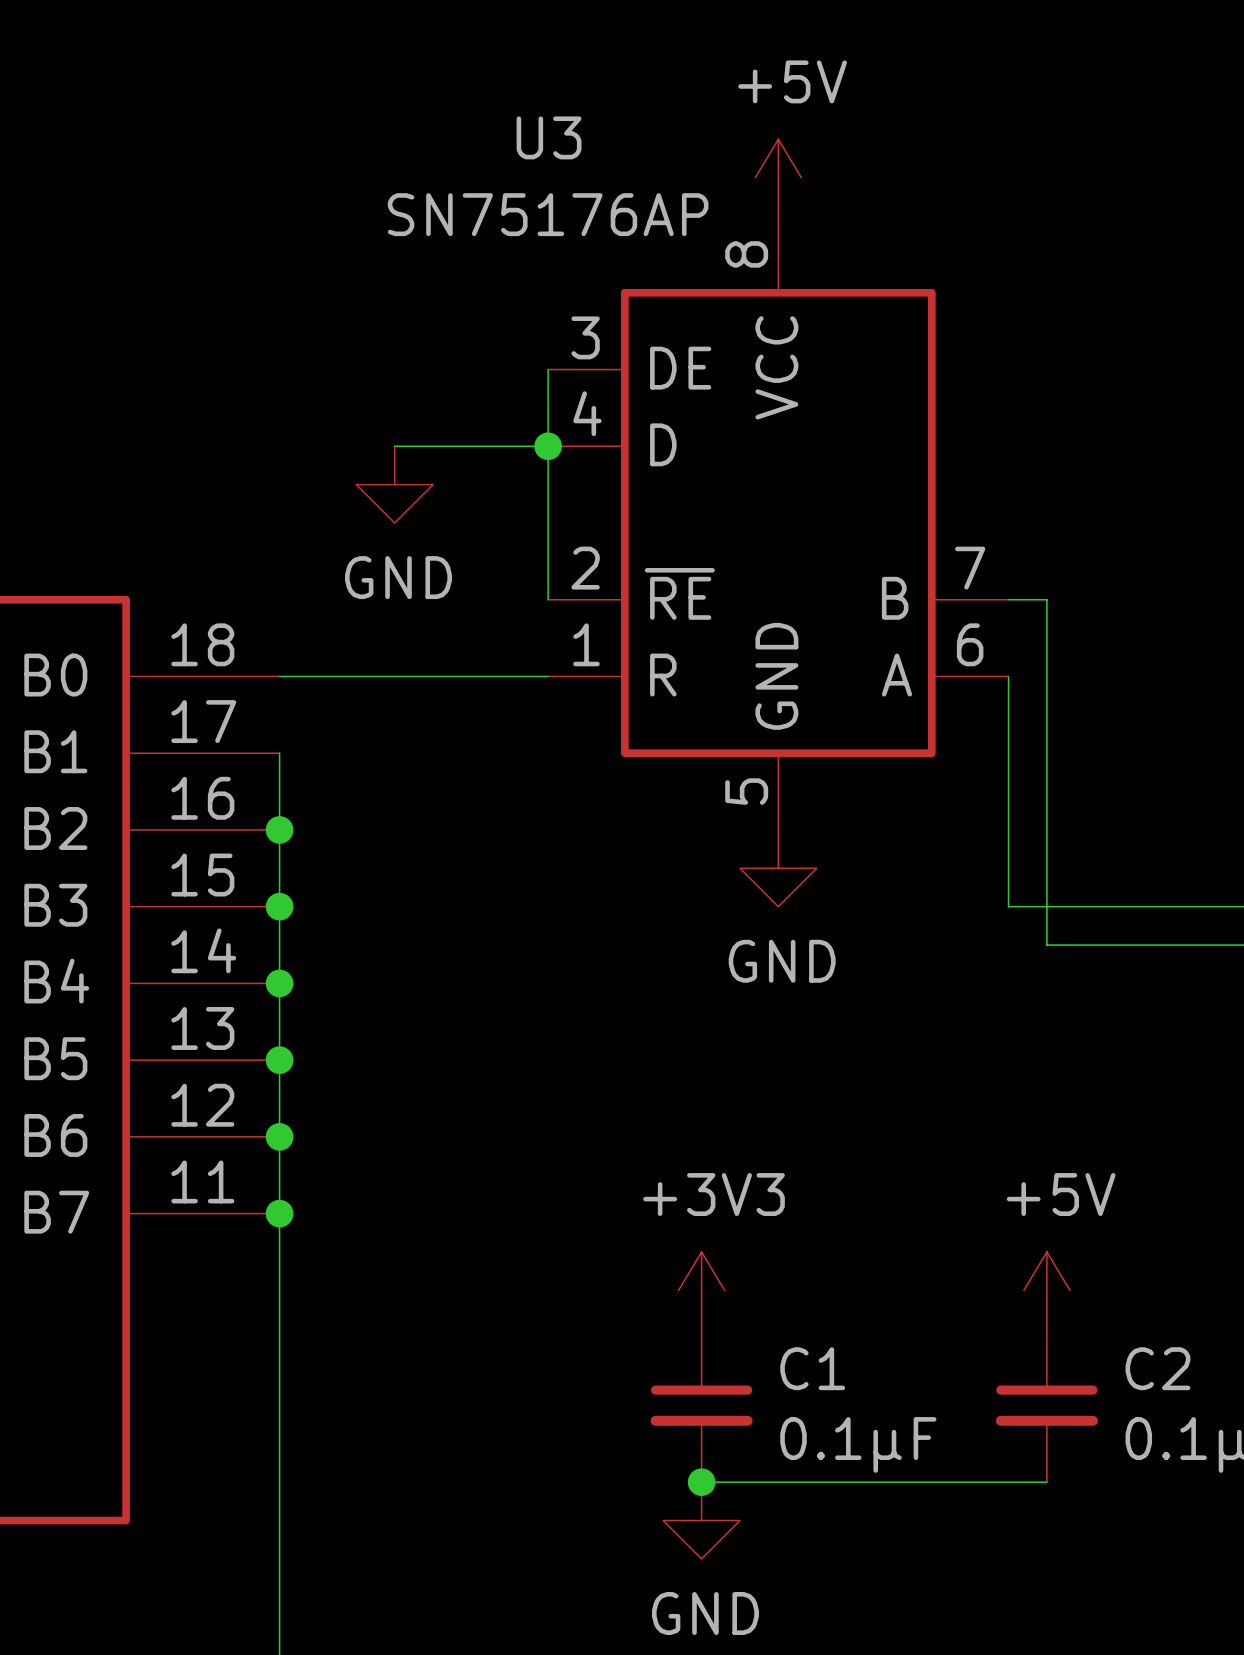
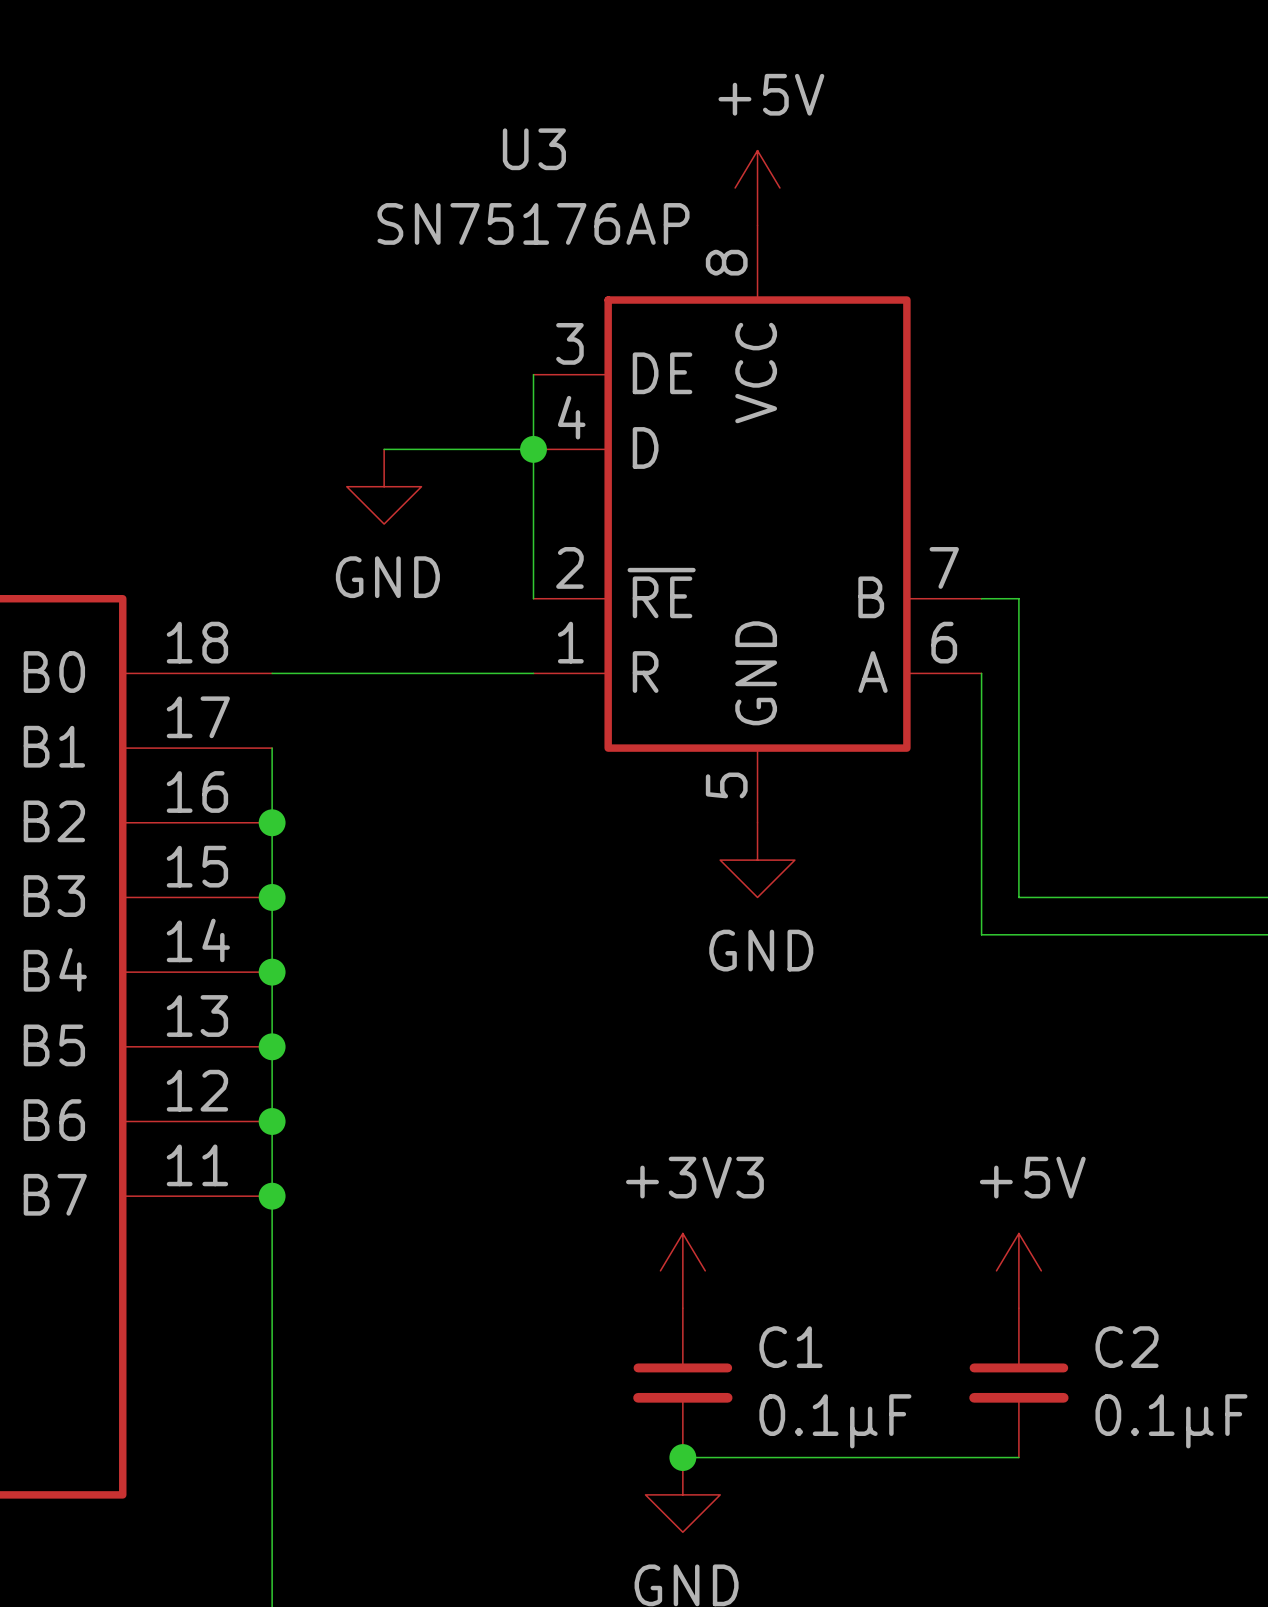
wire: (1008, 906) (1046, 906) (1046, 945) -> (981, 897) (981, 934) (1018, 934)

